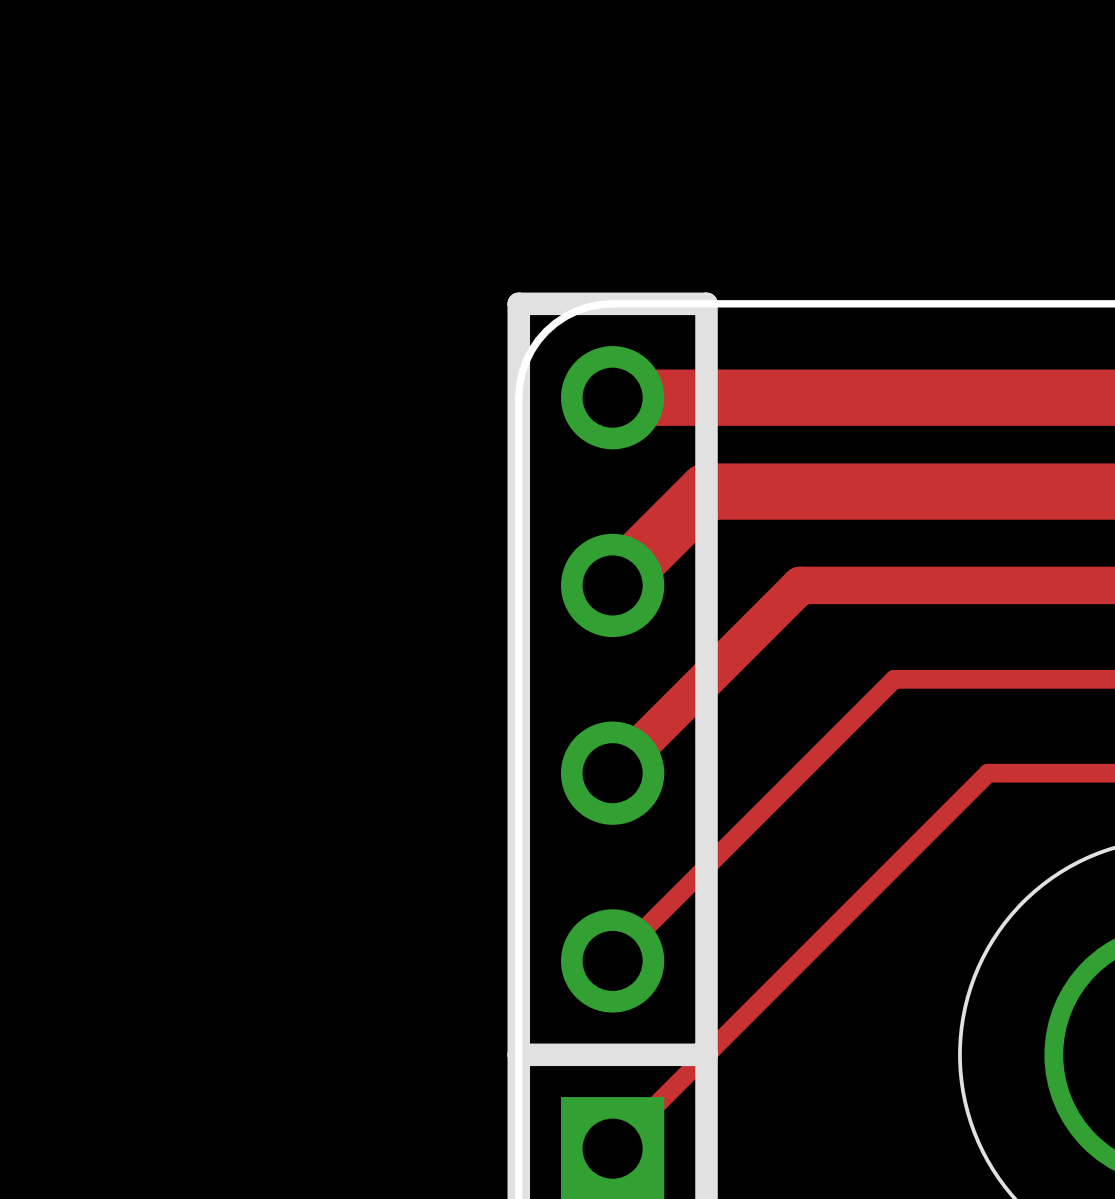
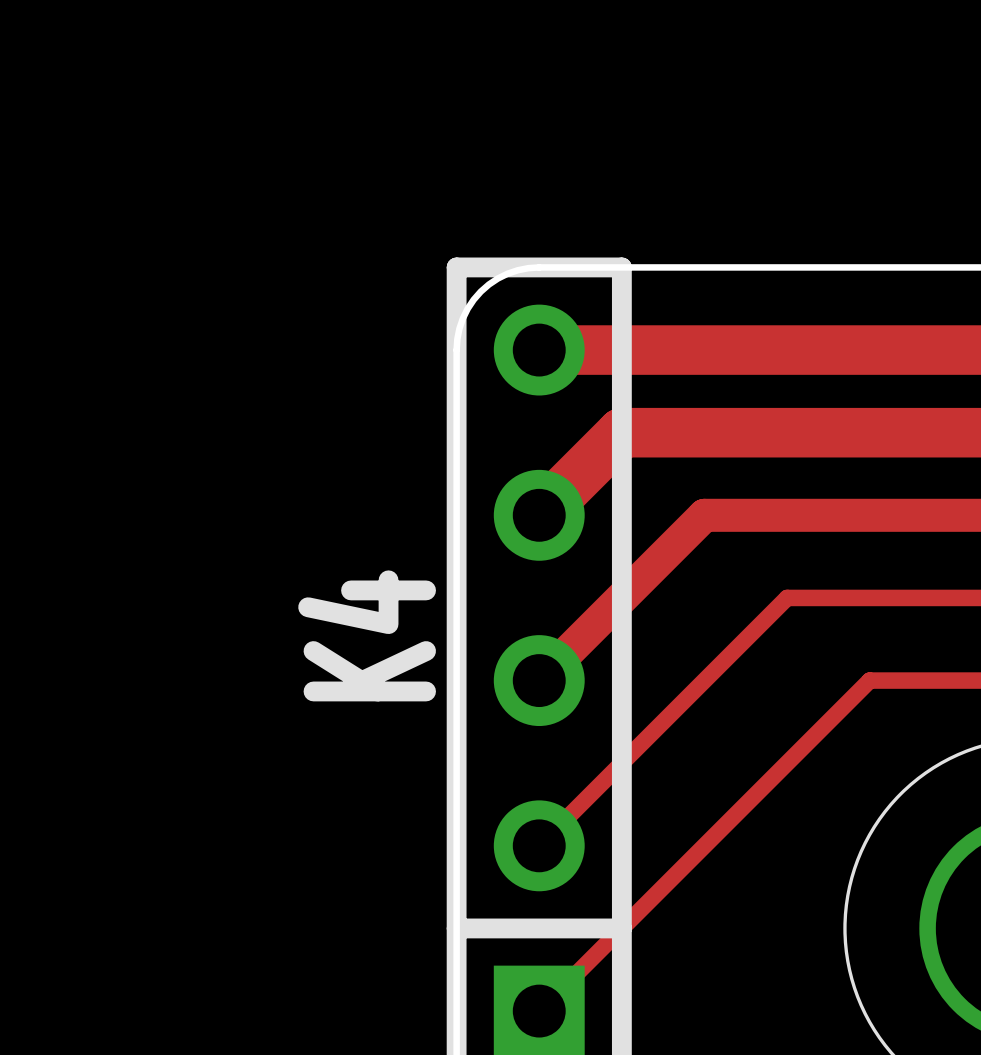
K4 name: none -> K4 (367, 635)

